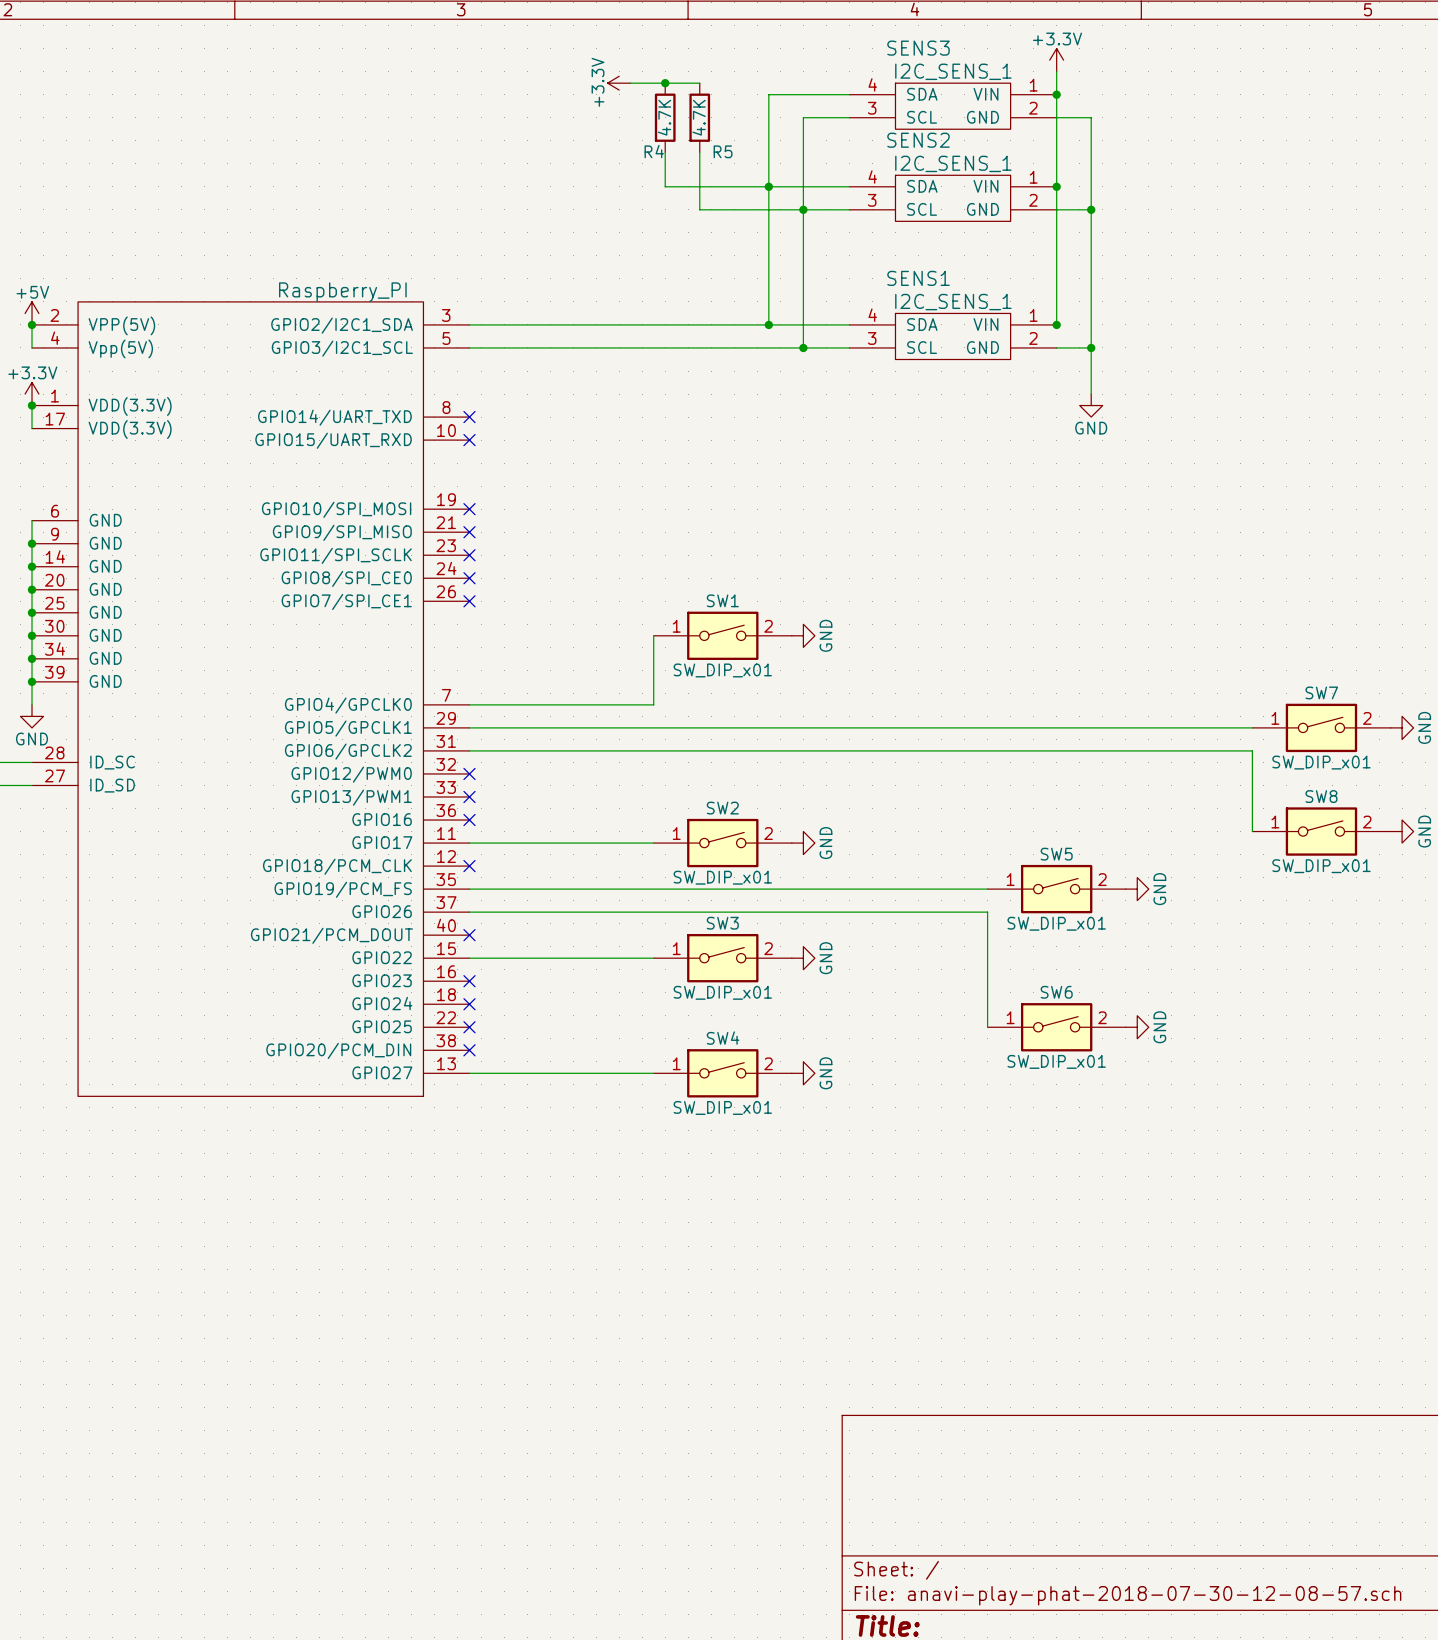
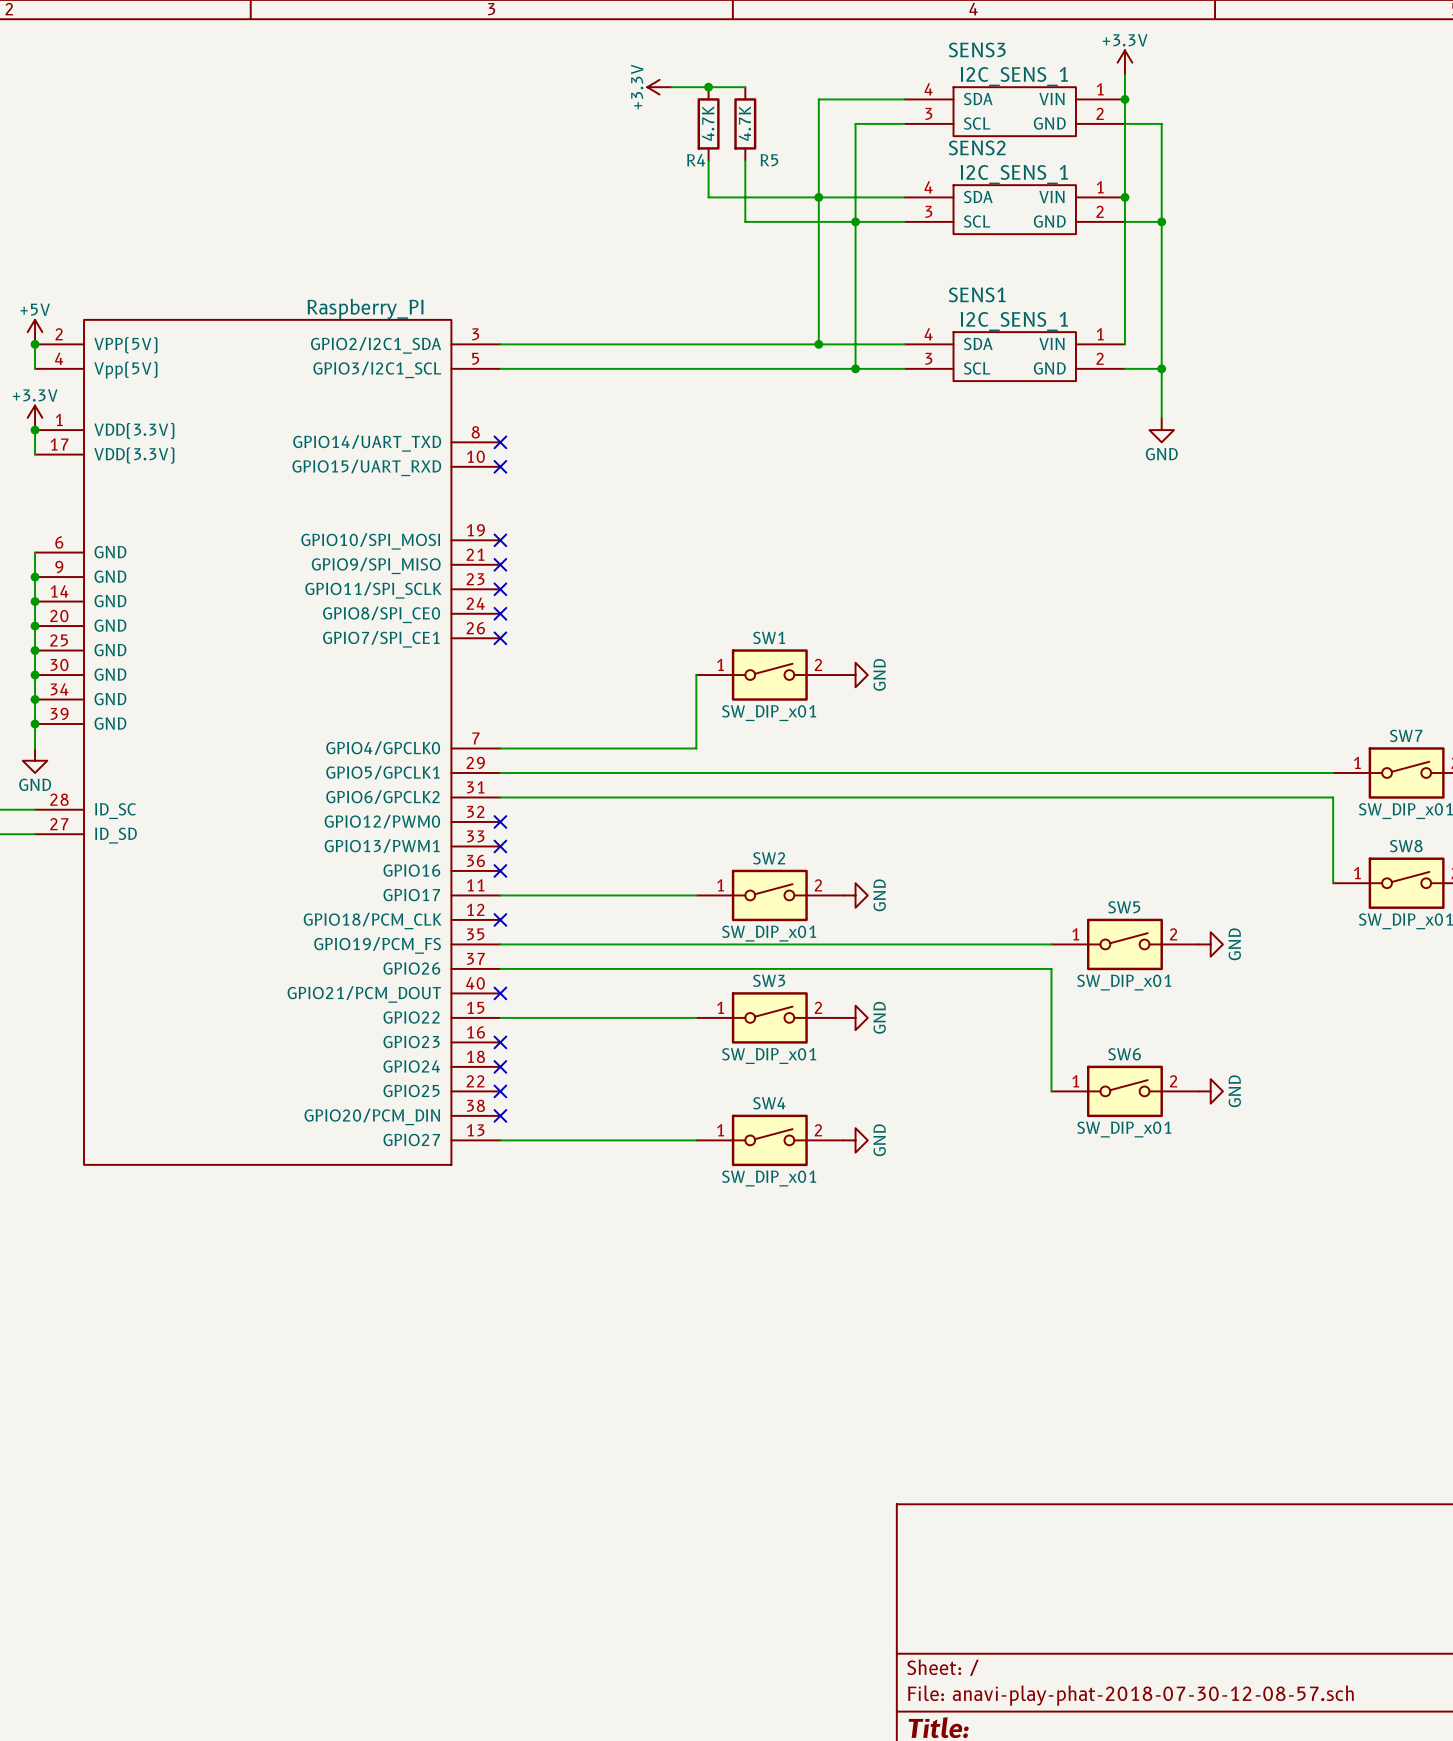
junction: (1056, 324) -> none

